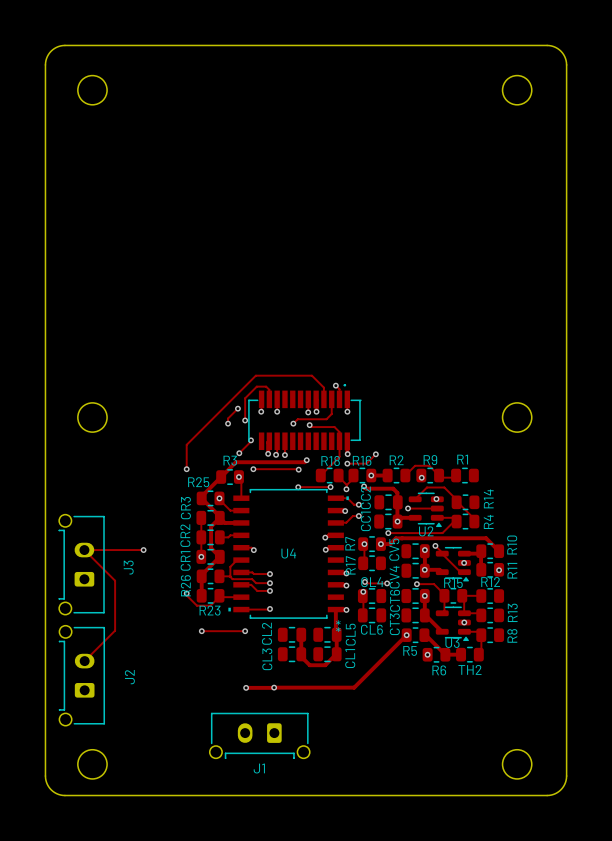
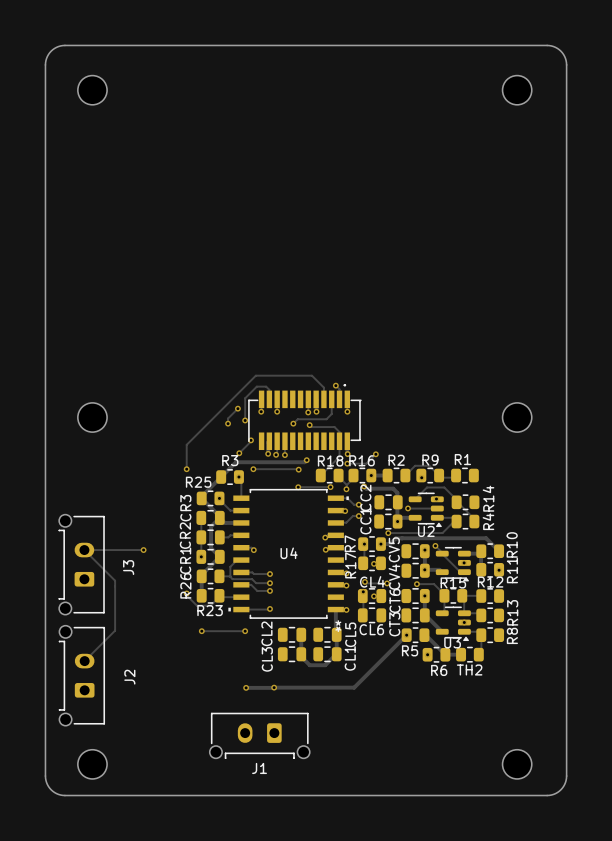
via: none -> (374, 563)
via: none -> (374, 596)

